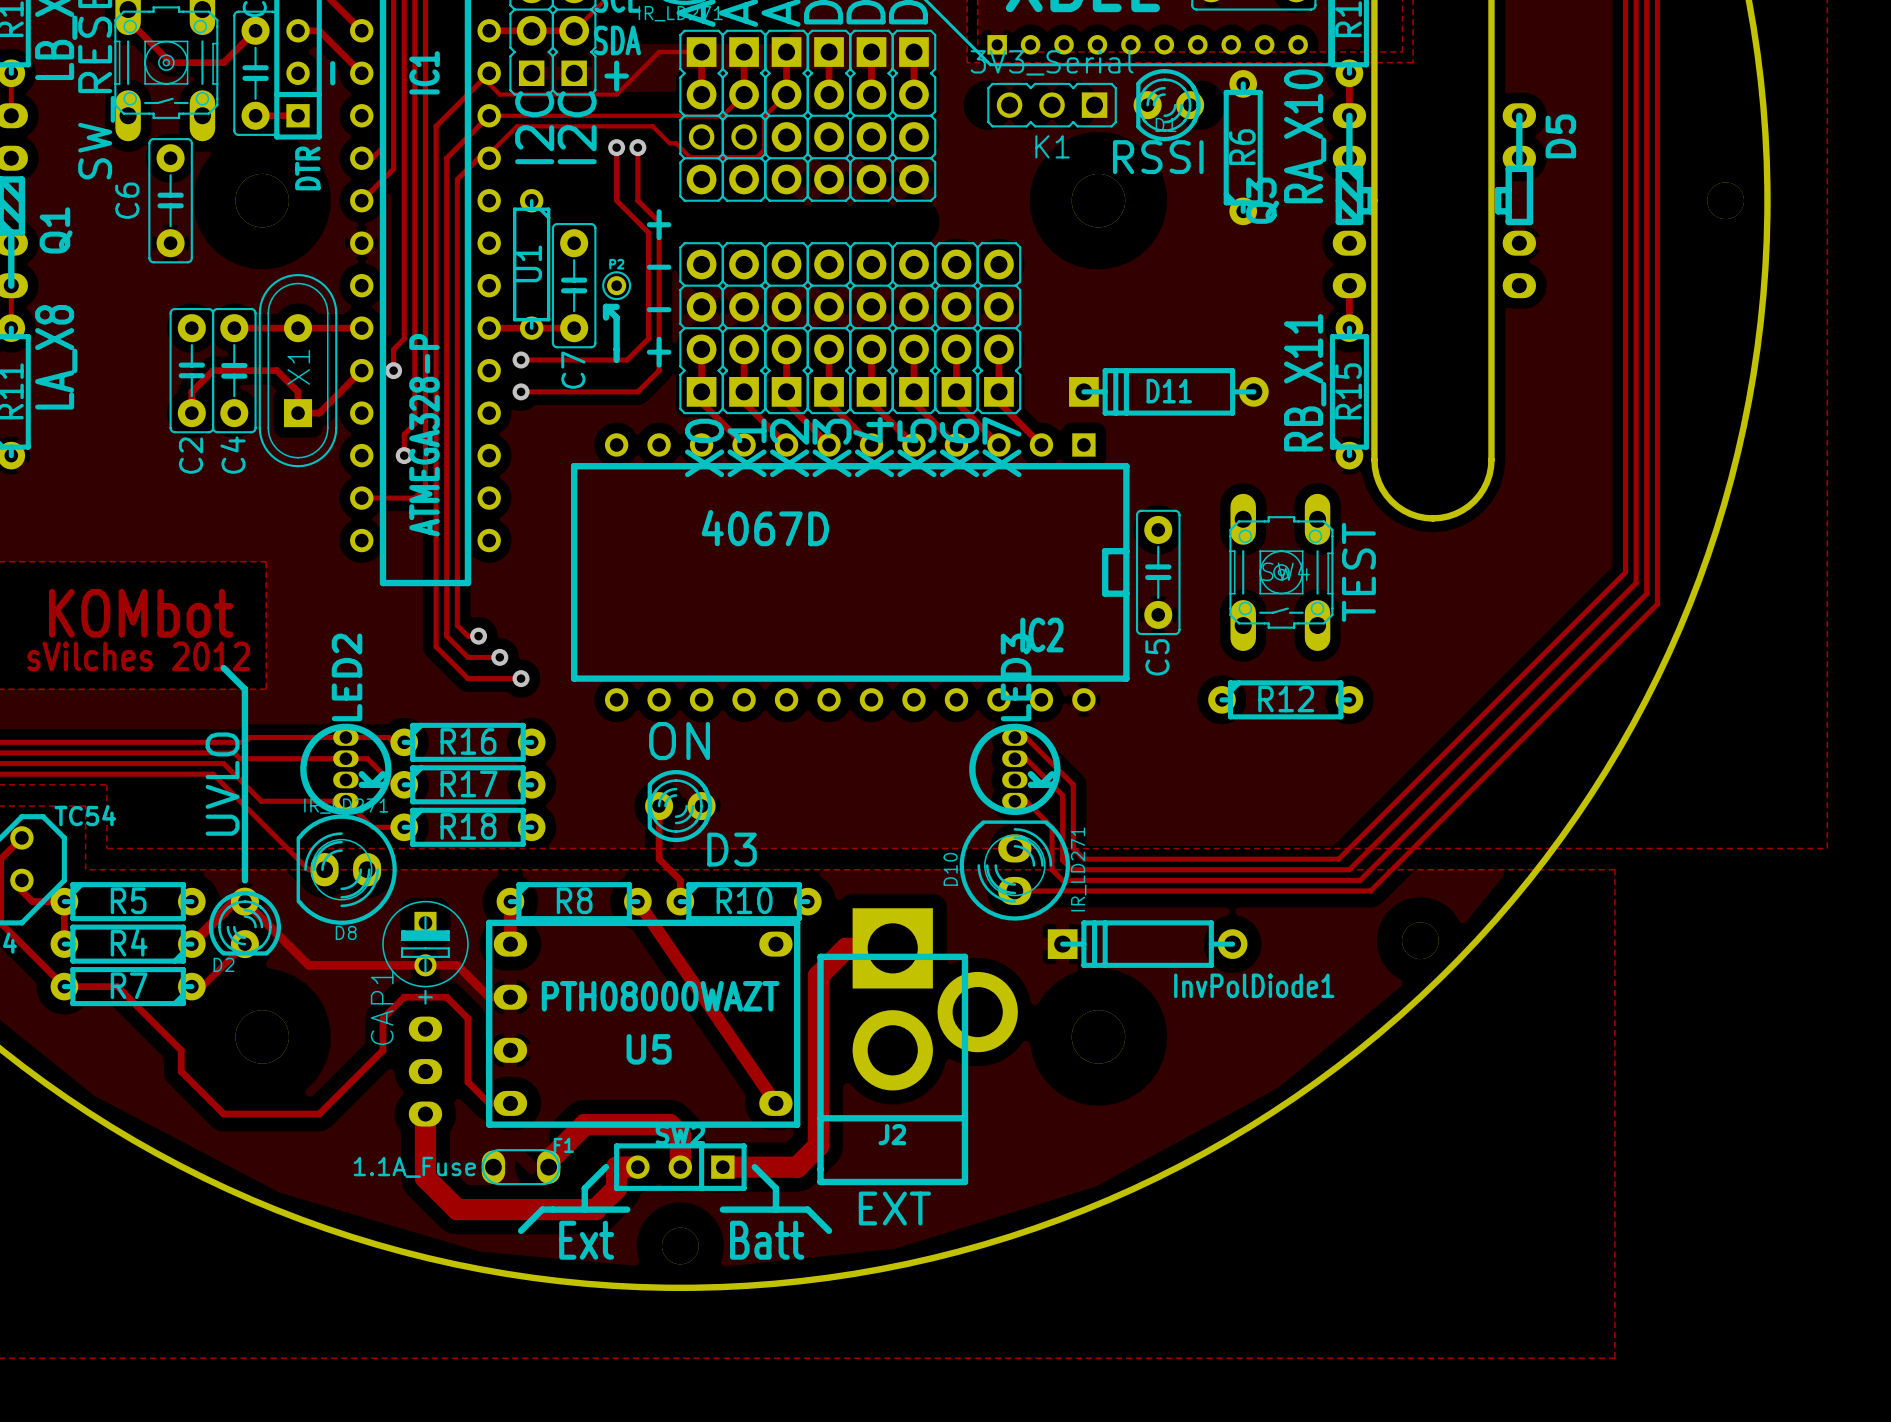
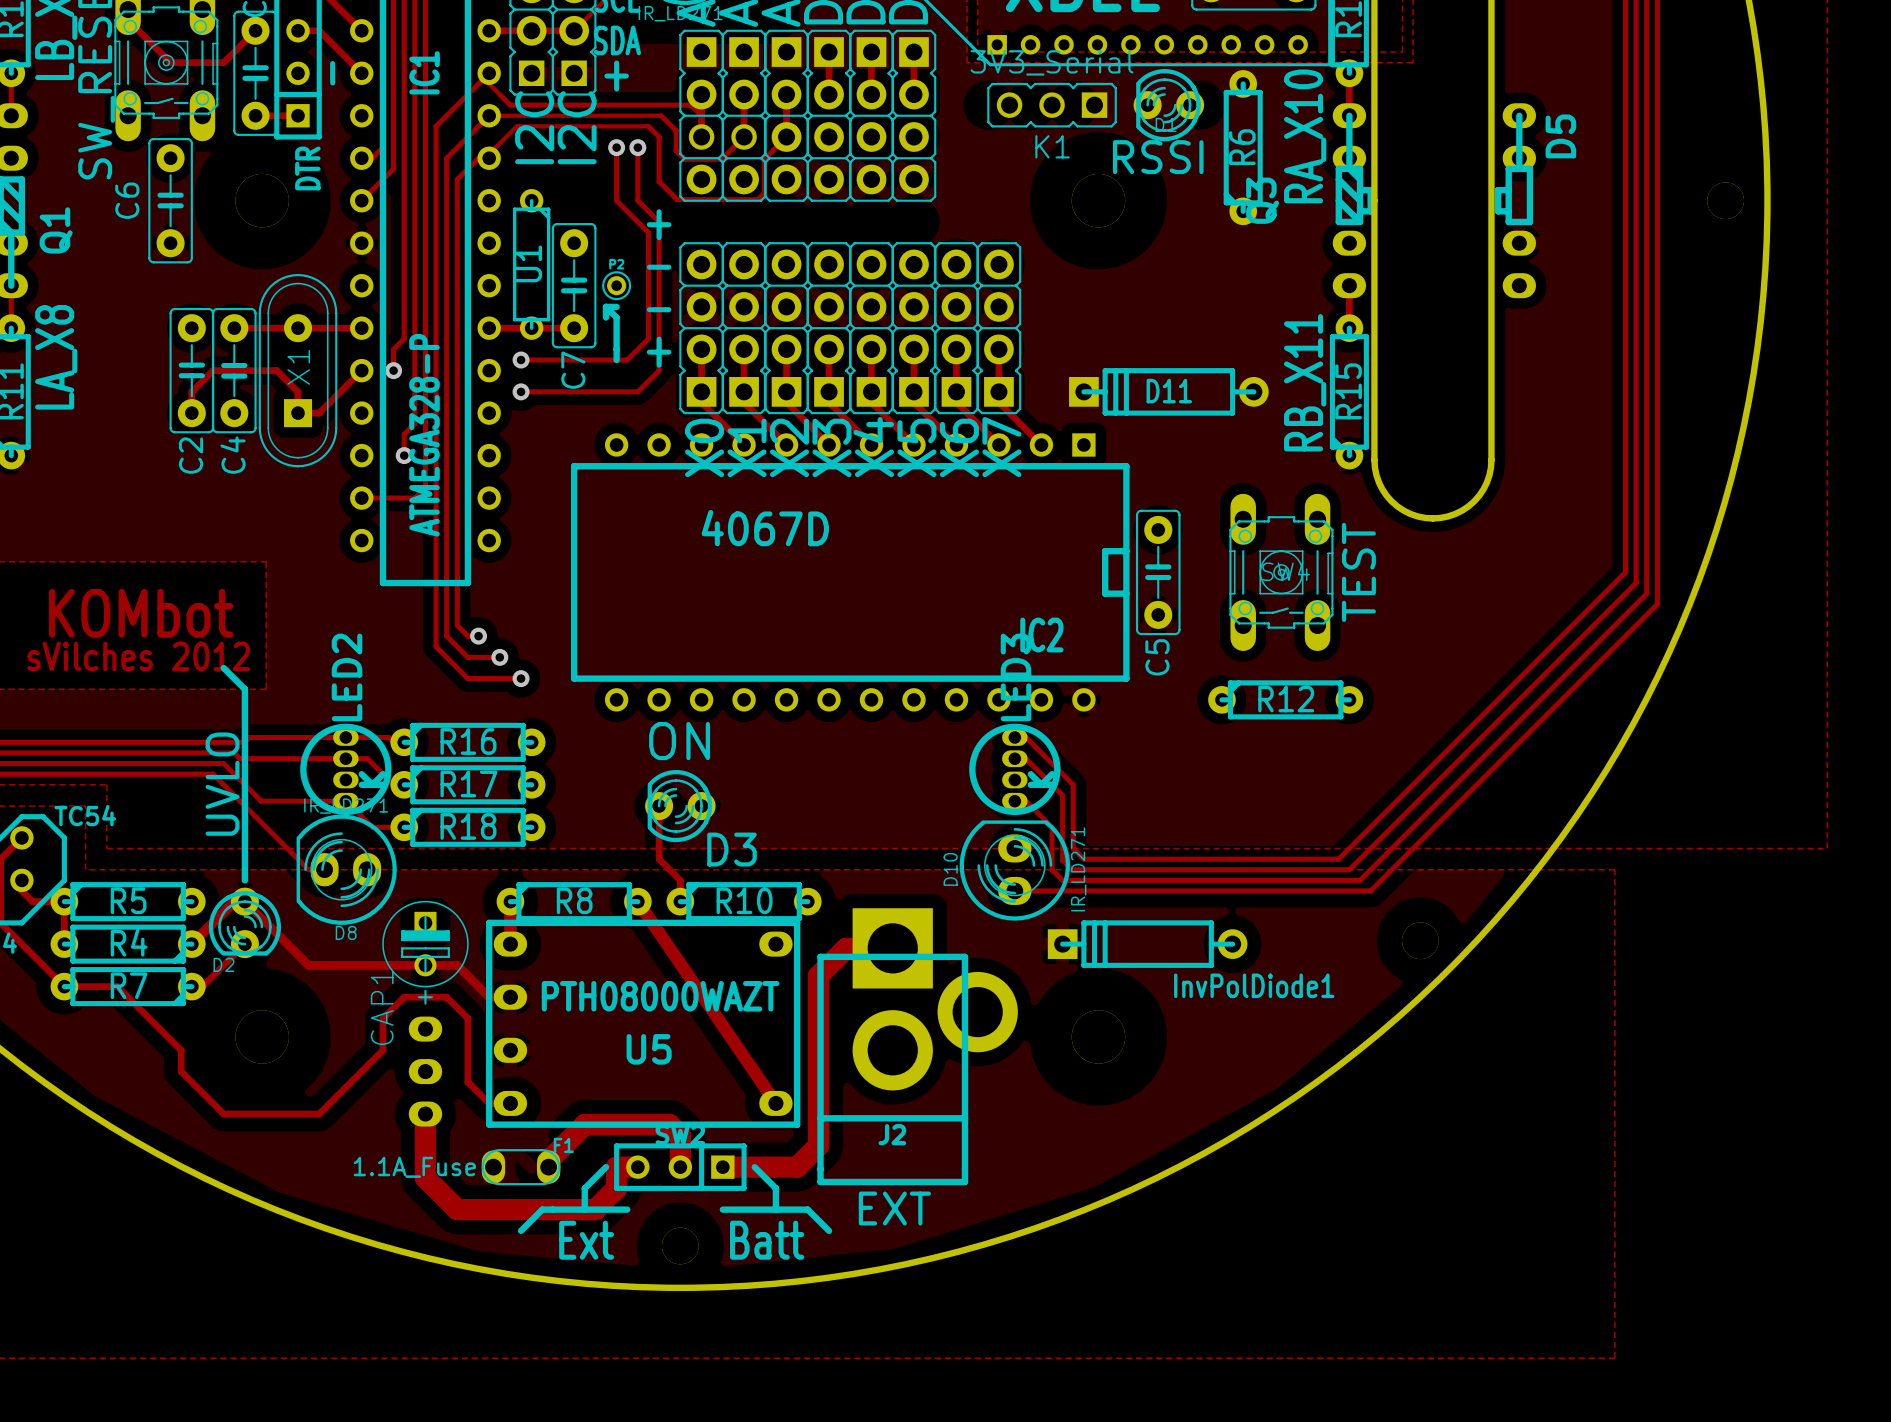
track: (744, 52) (744, 94) (721, 116) (661, 115) -> (744, 94) (744, 136) (721, 159) (684, 159) (676, 150) (676, 130) (661, 115)
track: (786, 52) (786, 94) (764, 116) (764, 149) (756, 157) (689, 157) (676, 143) (669, 143) (652, 126) (648, 126) -> (786, 94) (786, 136) (764, 159) (764, 193) (757, 199) (677, 199) (659, 181) (659, 136) (648, 126)
track: (499, 94) (616, 94) (659, 52) (701, 52) (701, 94) -> (499, 94) (510, 105) (690, 105) (701, 115) (701, 94) (701, 136)

